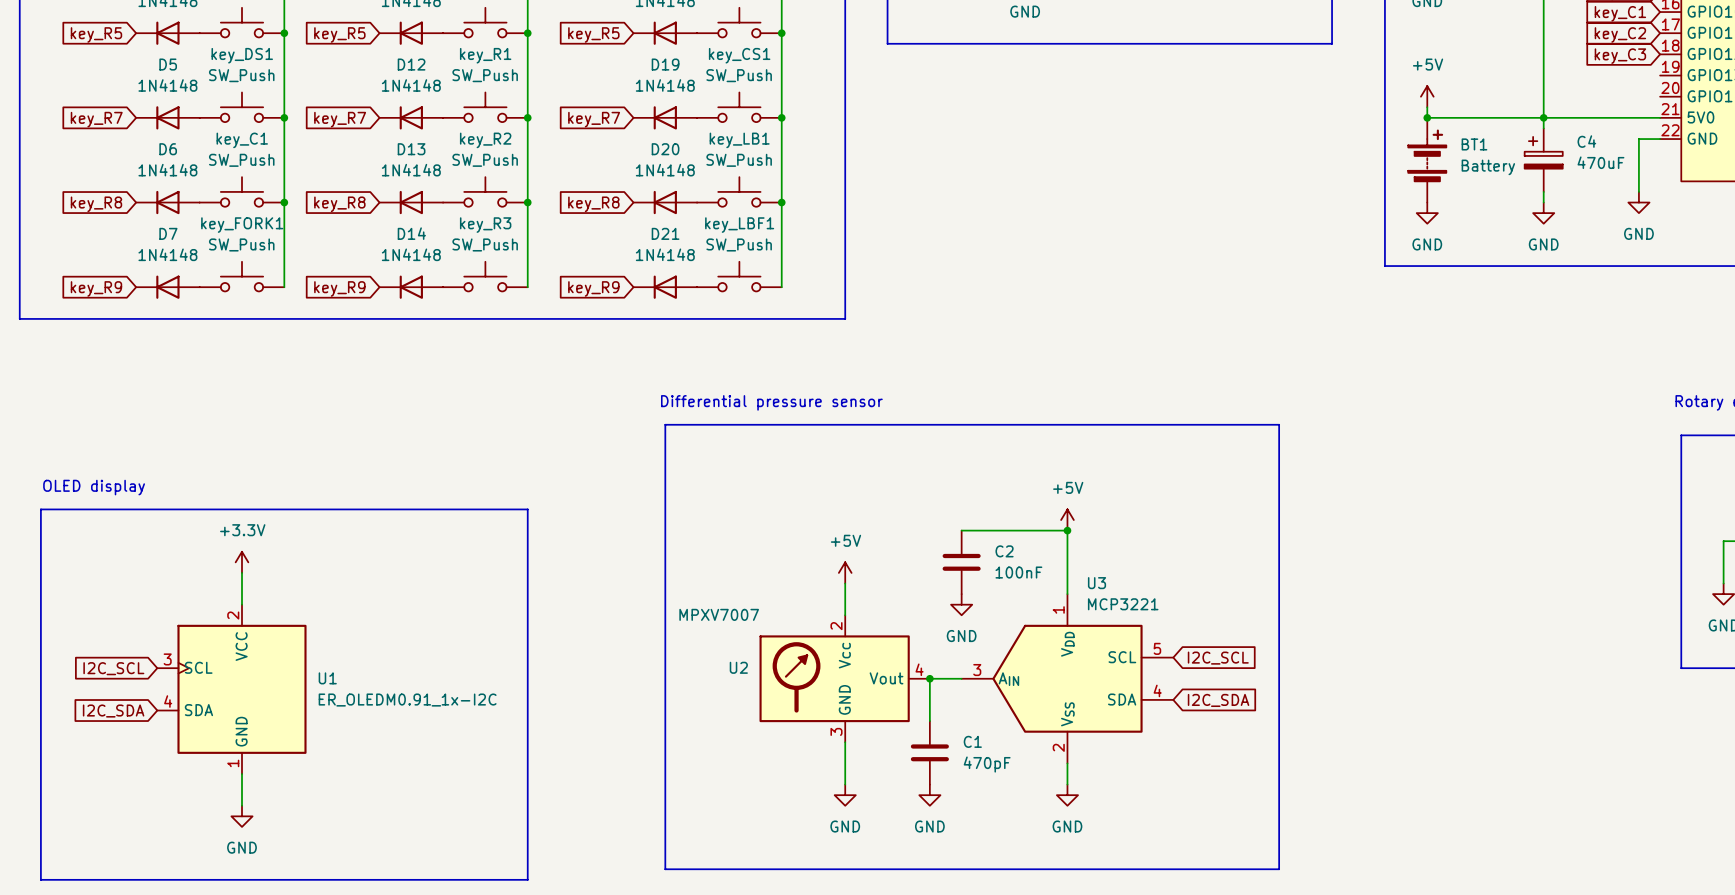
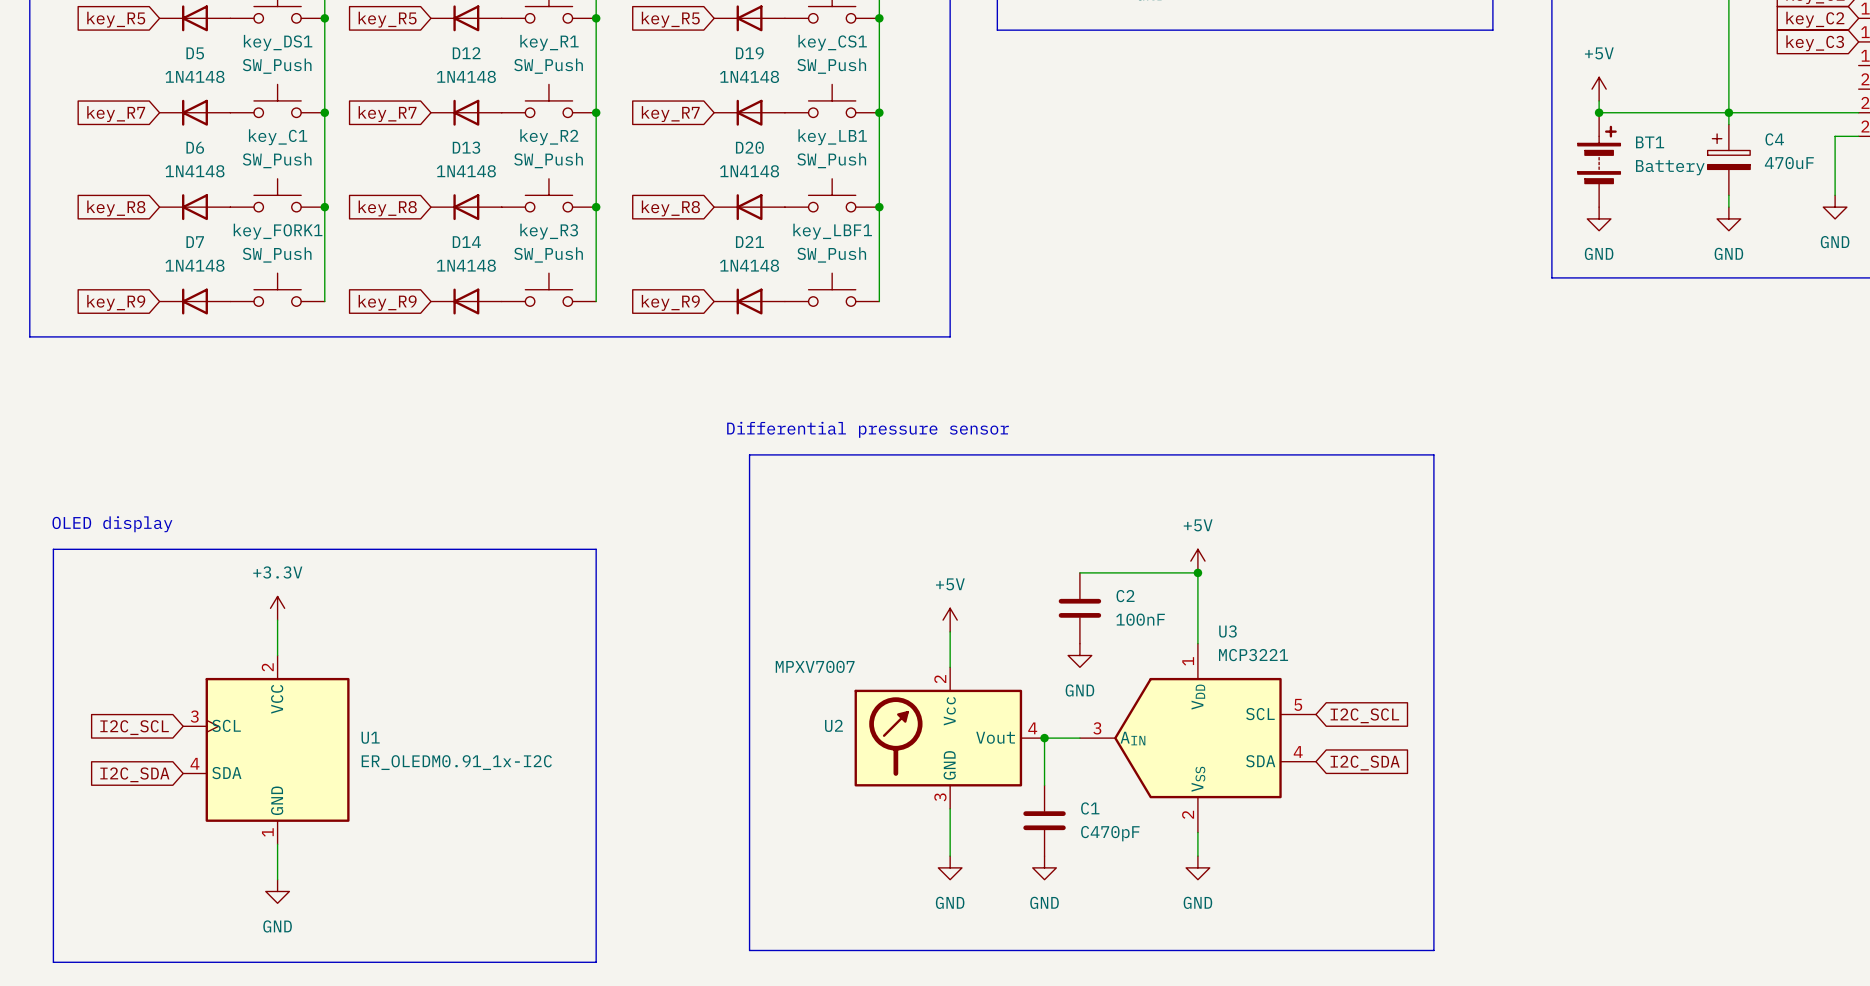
C1 value: 470pF (987, 764) -> C470pF (1110, 833)

